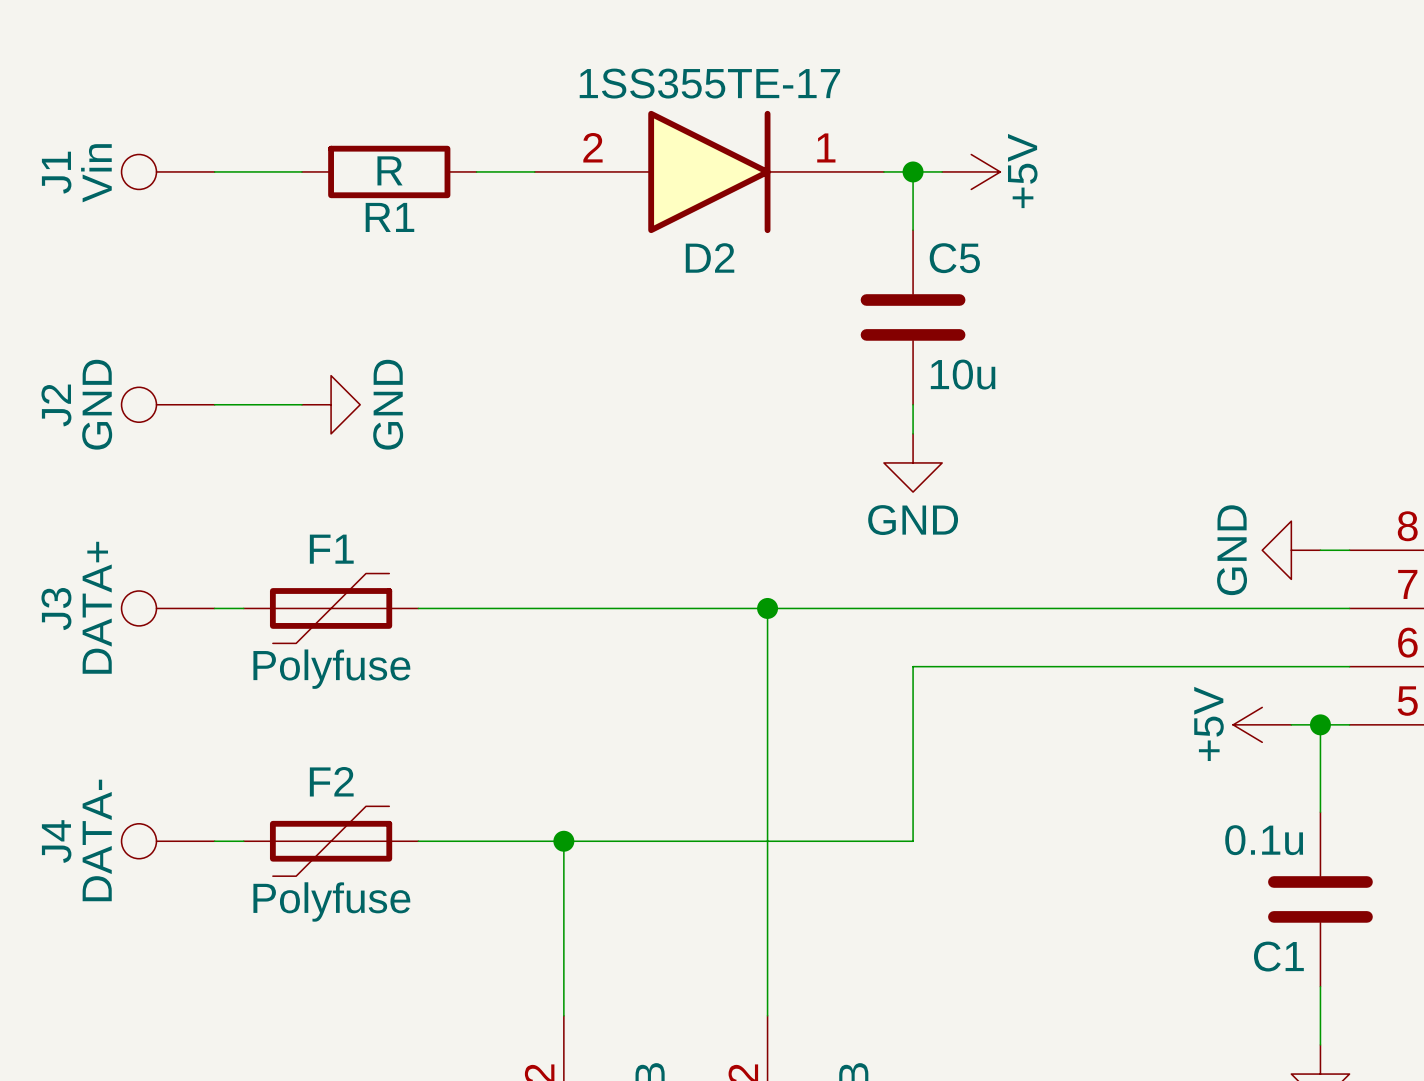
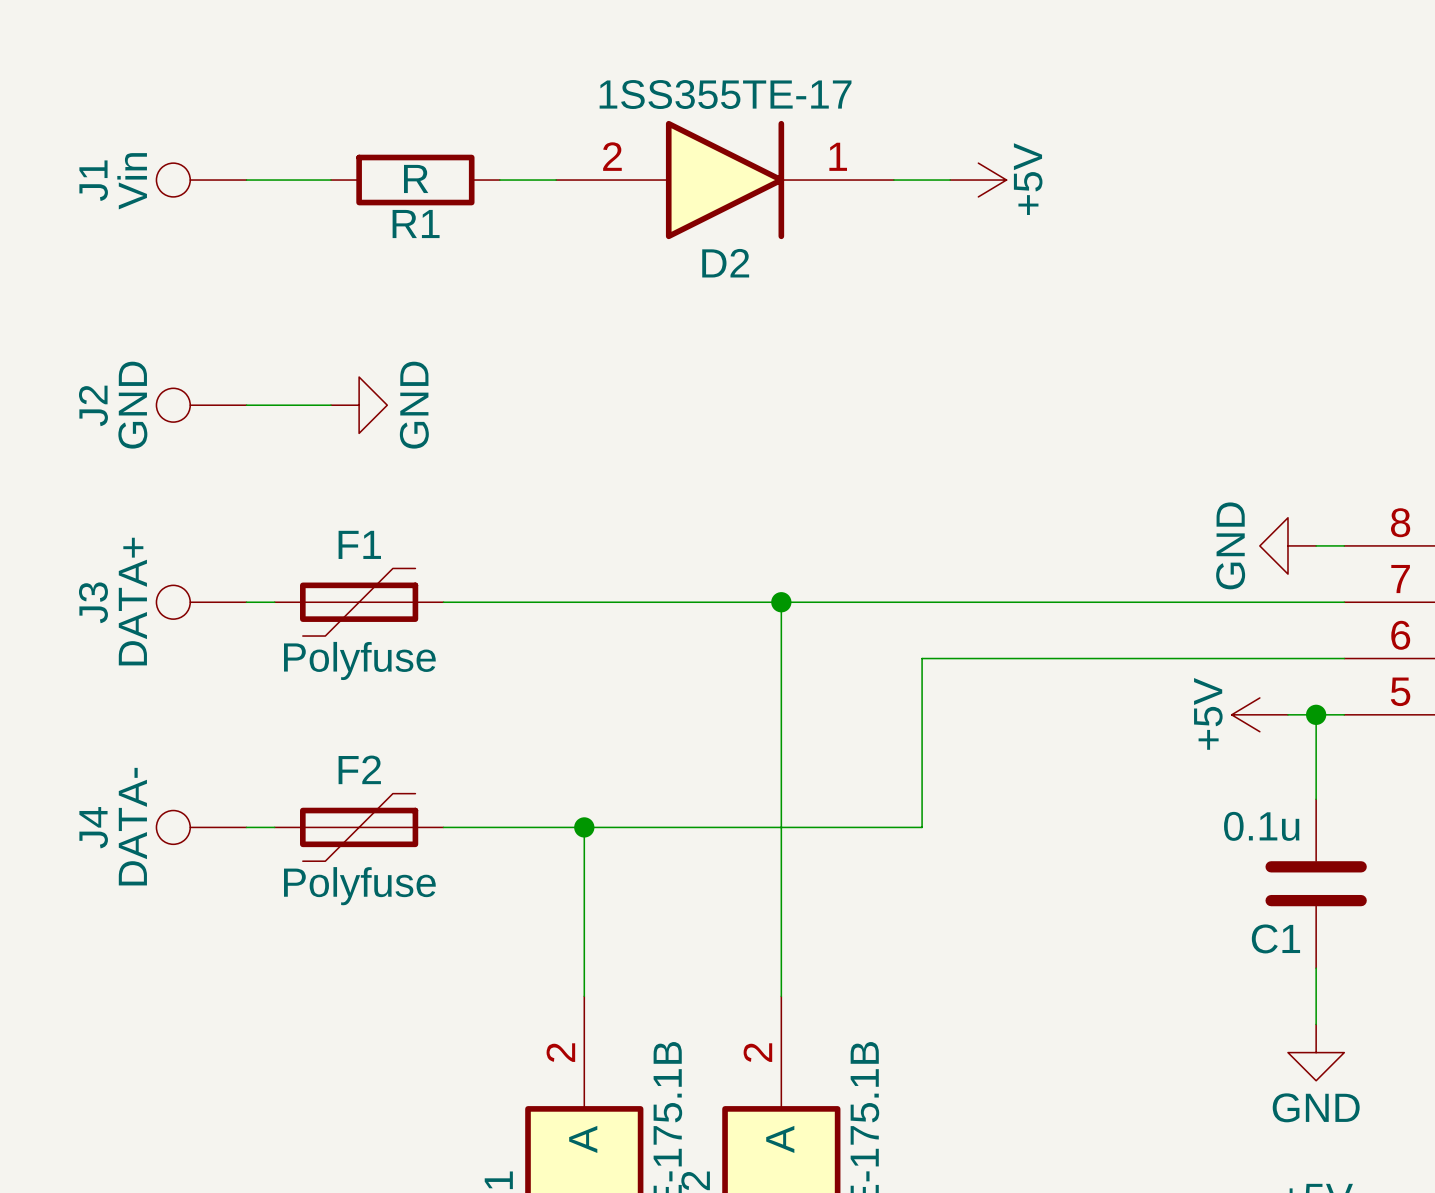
wire: (913, 171) (913, 230) -> none
junction: (913, 171) -> none
C5: 10u (913, 317) -> none
wire: (913, 404) (913, 433) -> none
power symbol: GND (913, 462) -> none

